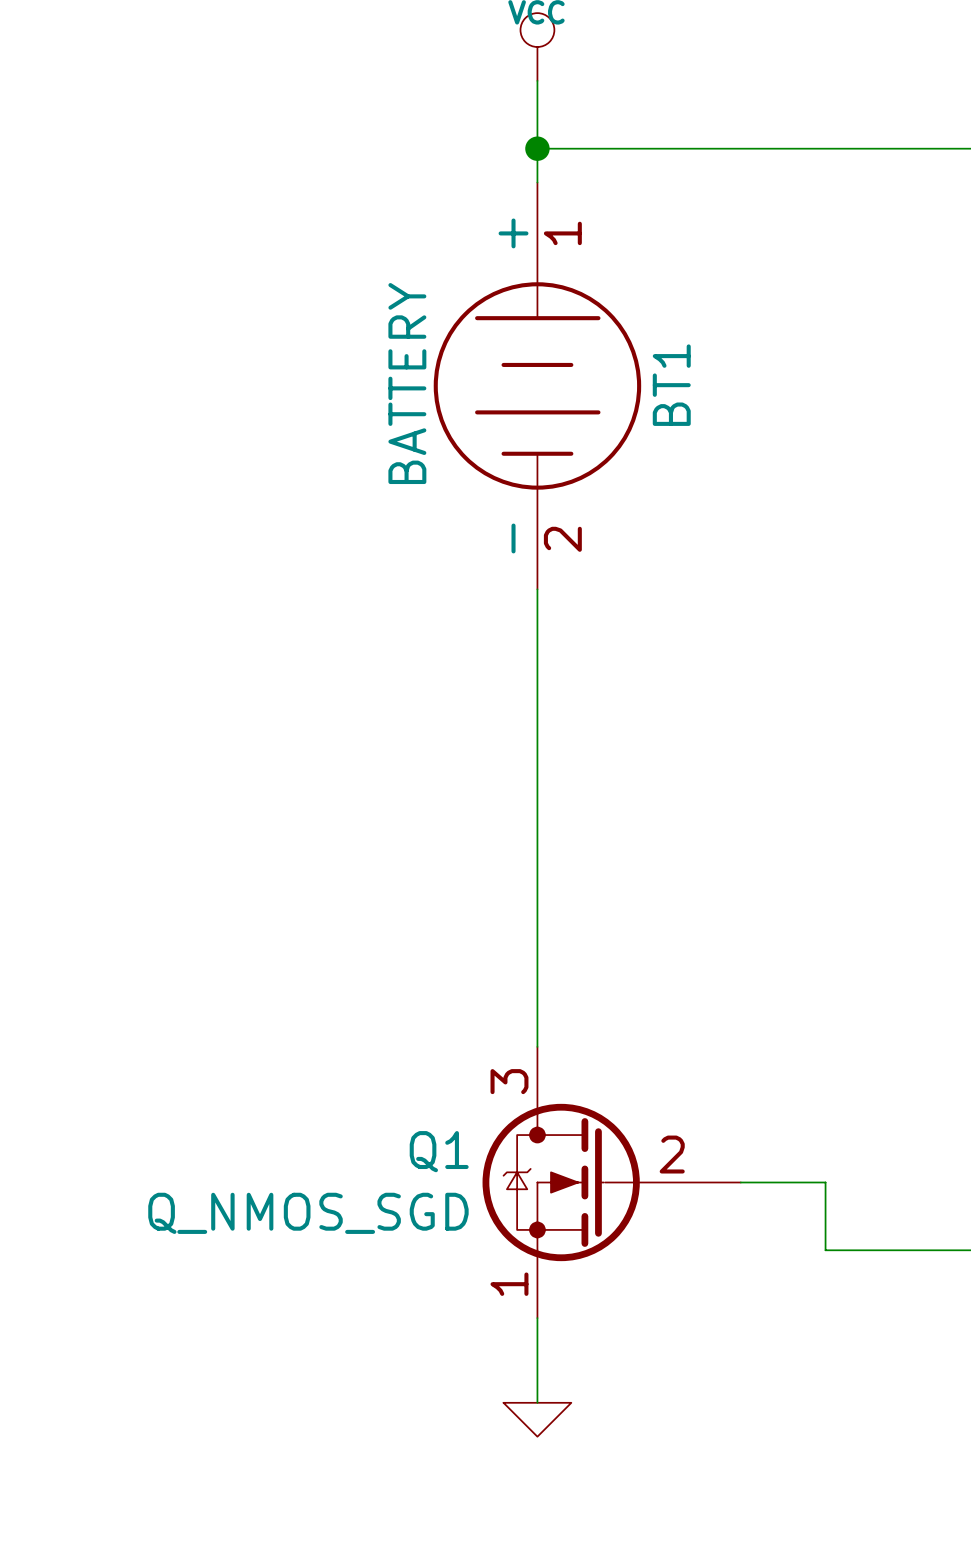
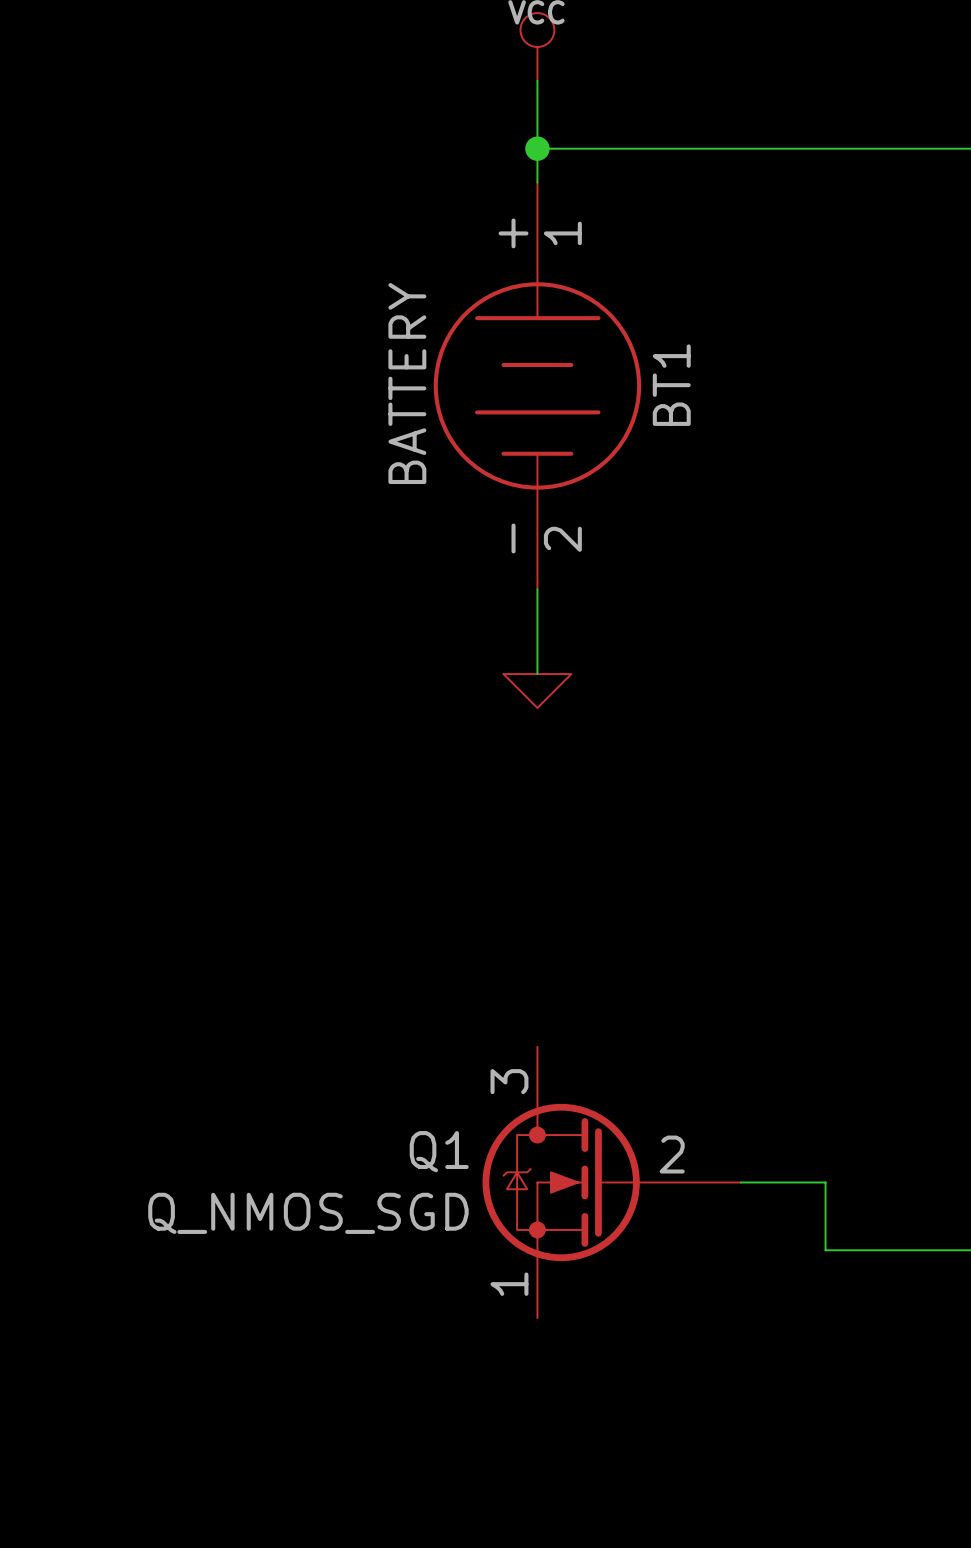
wire: (537, 674) (537, 1046) -> none
power symbol: none -> (537, 691)
wire: (537, 1318) (537, 1402) -> none
power symbol: (537, 1419) -> none

